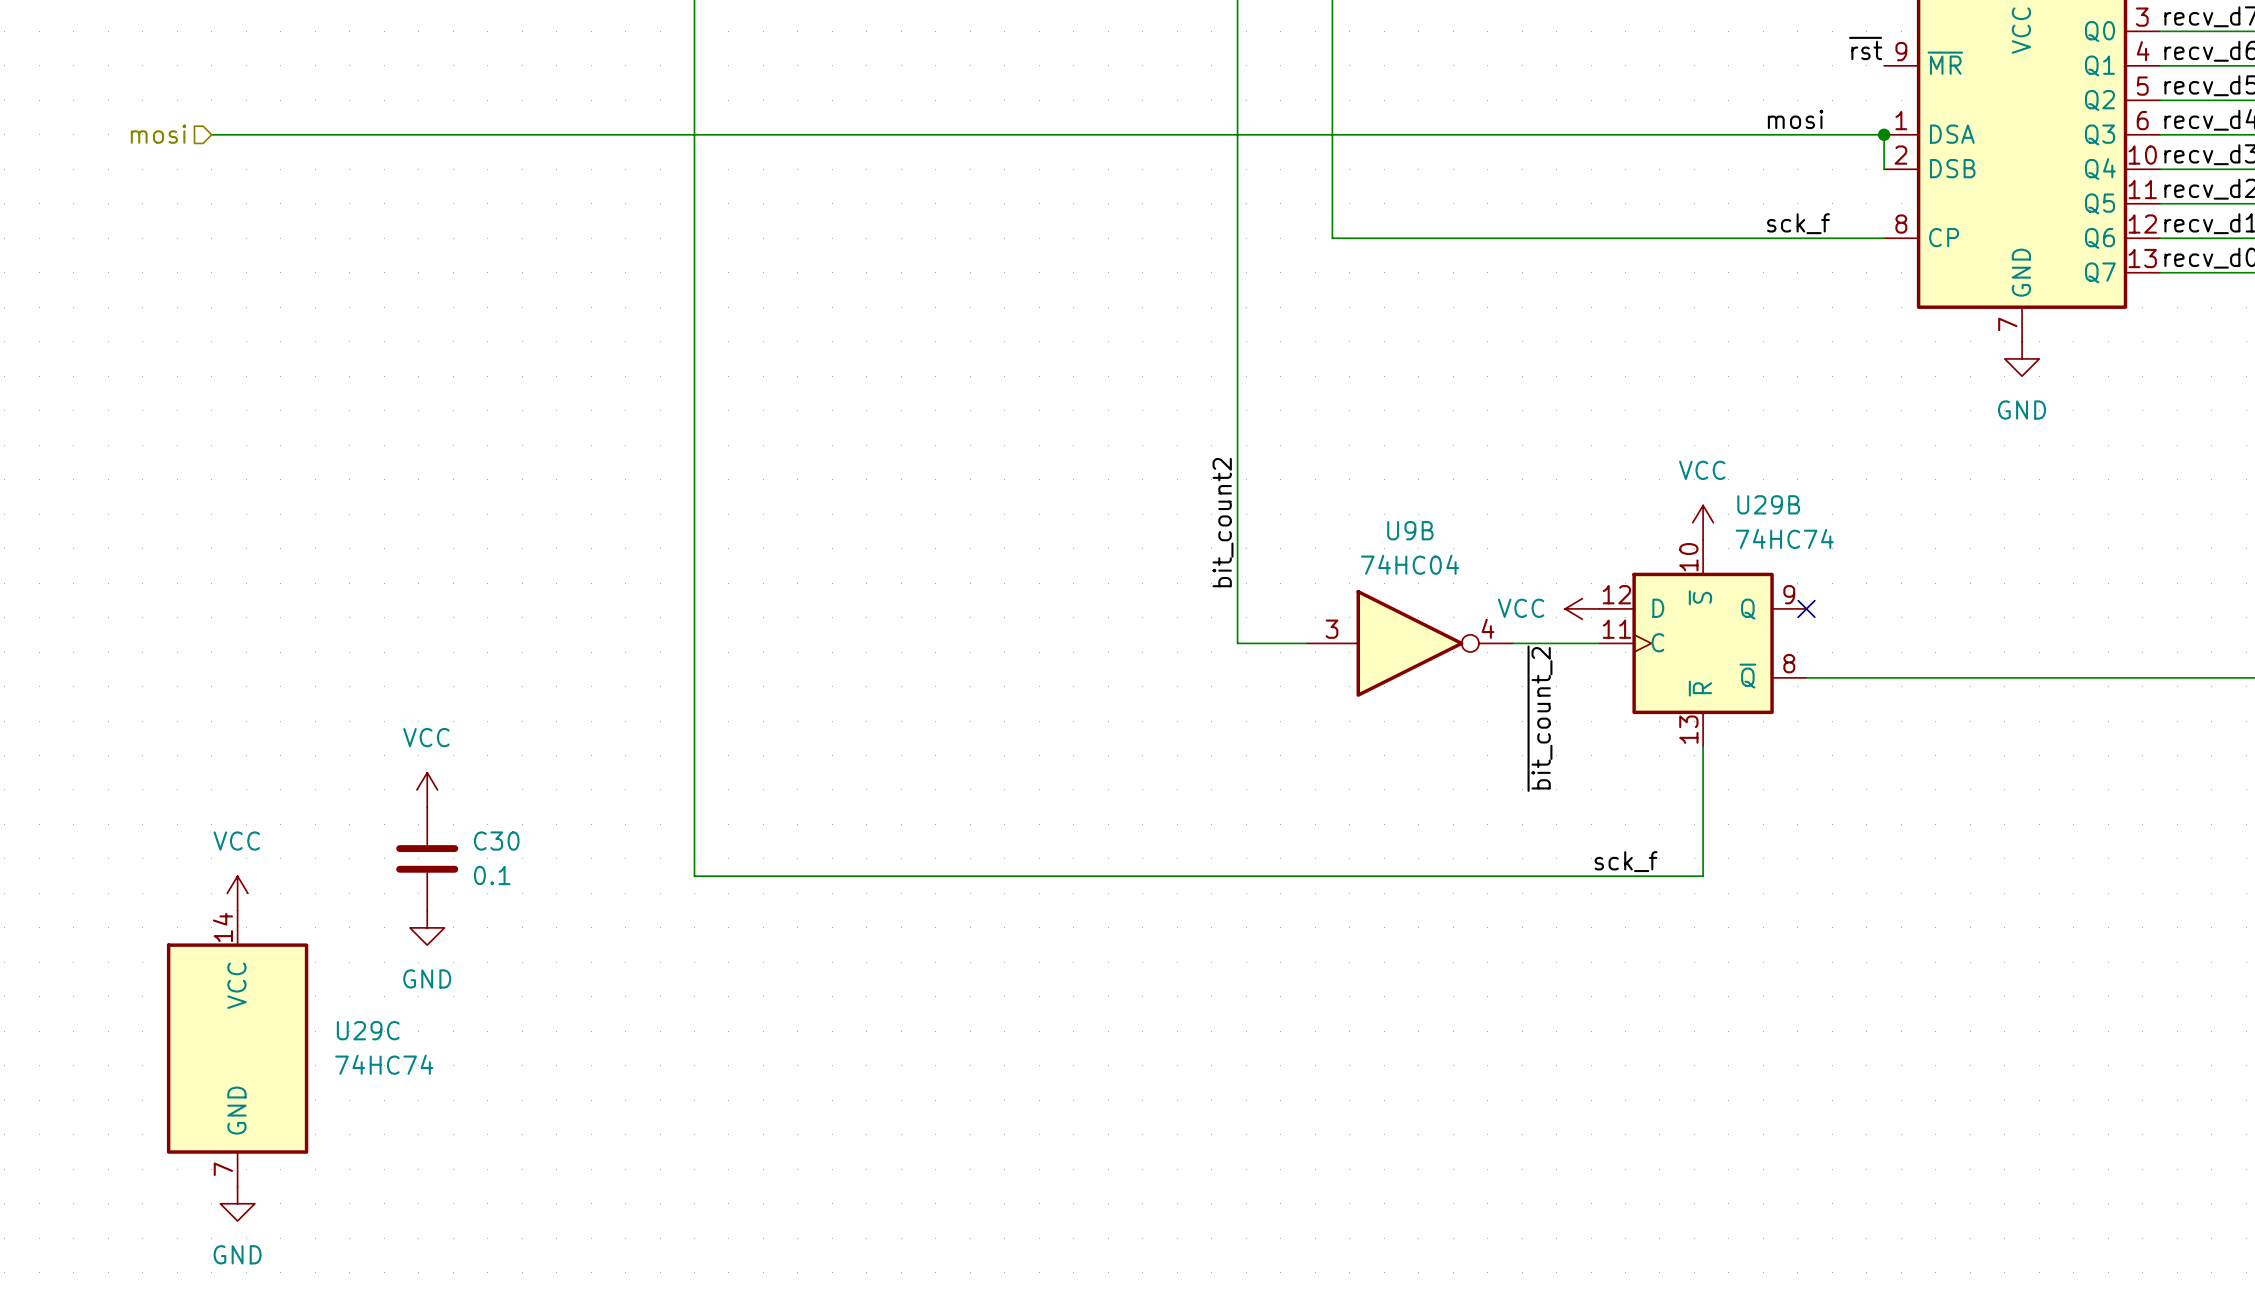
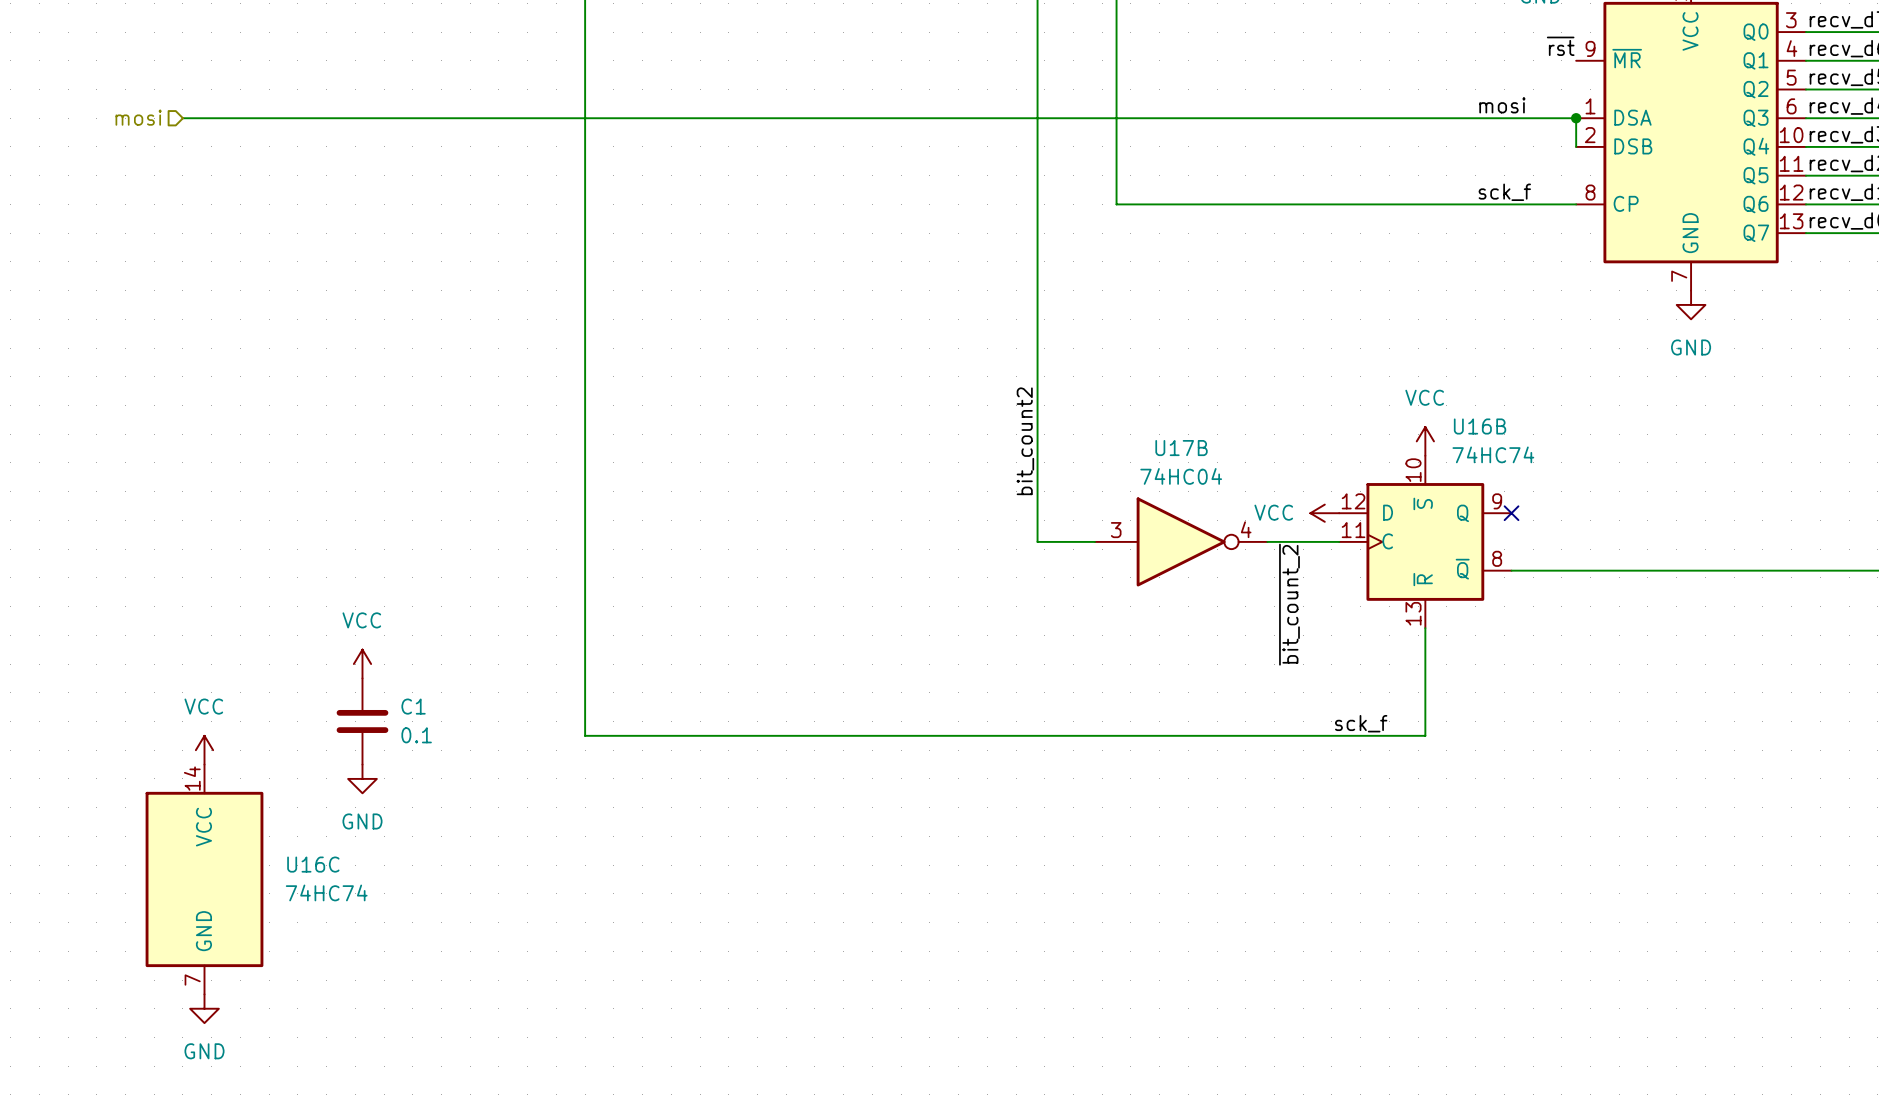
U29B name: U29B (1768, 504) -> U16B (1480, 426)
U9B name: U9B (1410, 530) -> U17B (1181, 448)
C30 name: C30 (496, 841) -> C1 (413, 706)
U29C name: U29C (368, 1030) -> U16C (313, 864)

